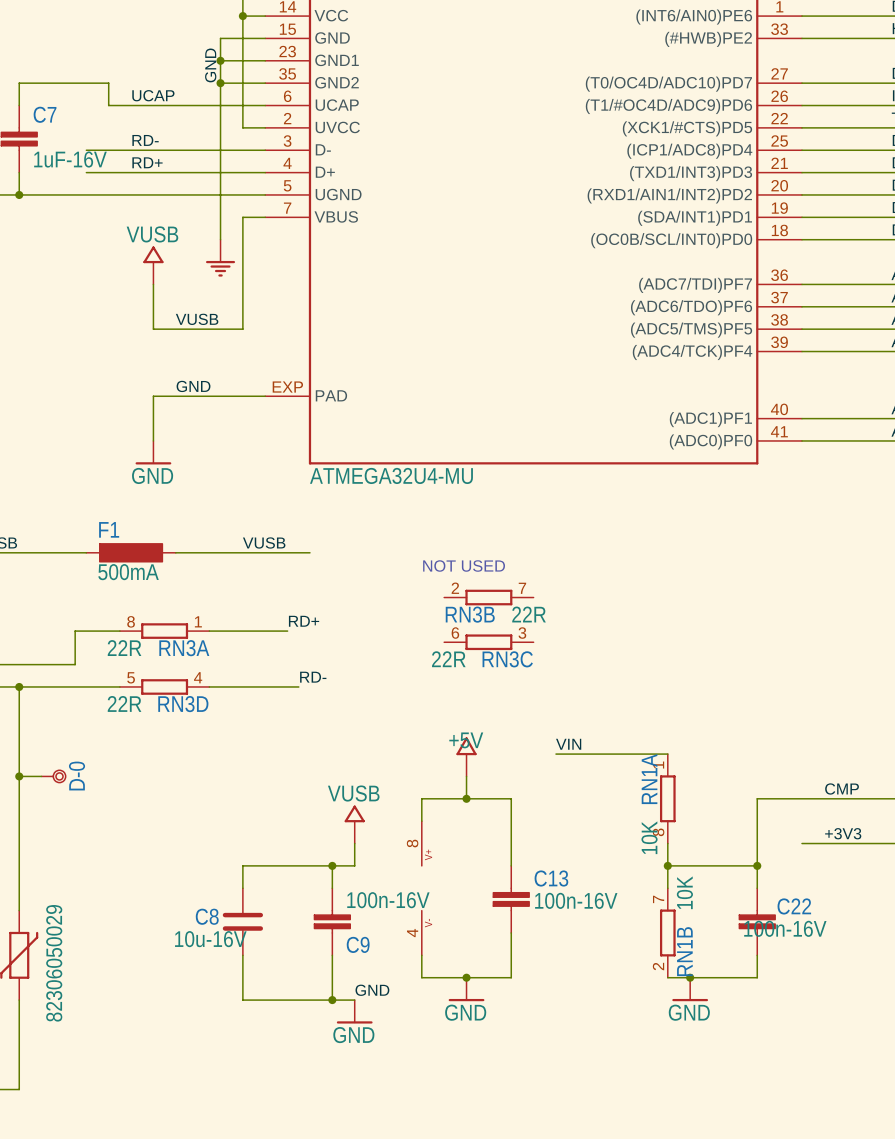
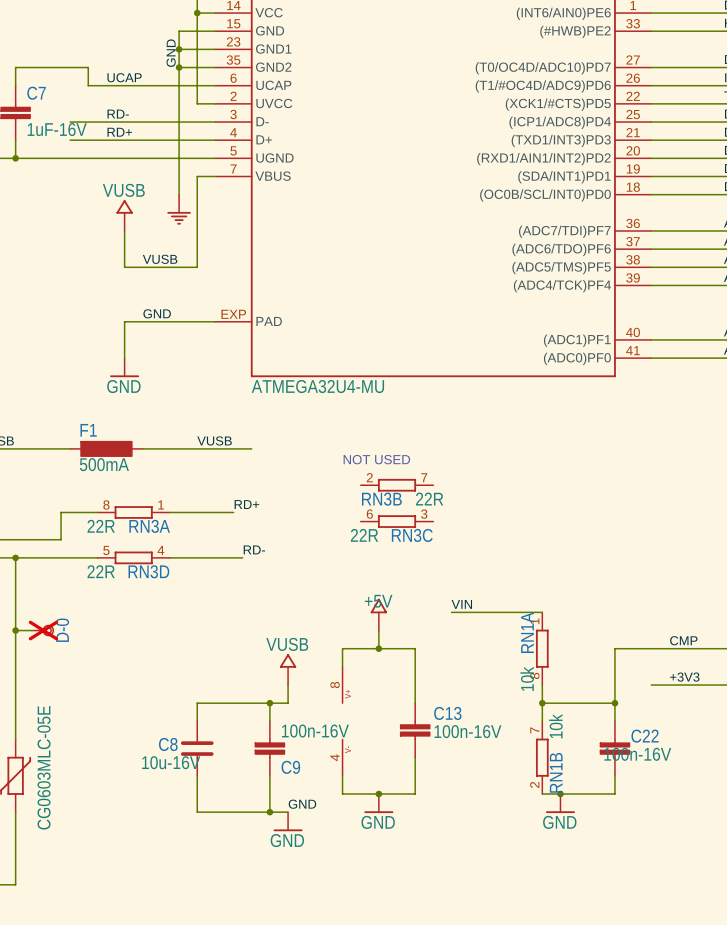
D-0 do-not-place cross: none -> (43, 630)
RN1A value: 10K (649, 837) -> 10k (527, 678)
RN1B value: 10K (684, 892) -> 10k (555, 726)
part value: 82306050029 (54, 963) -> CG0603MLC-05E (44, 767)

